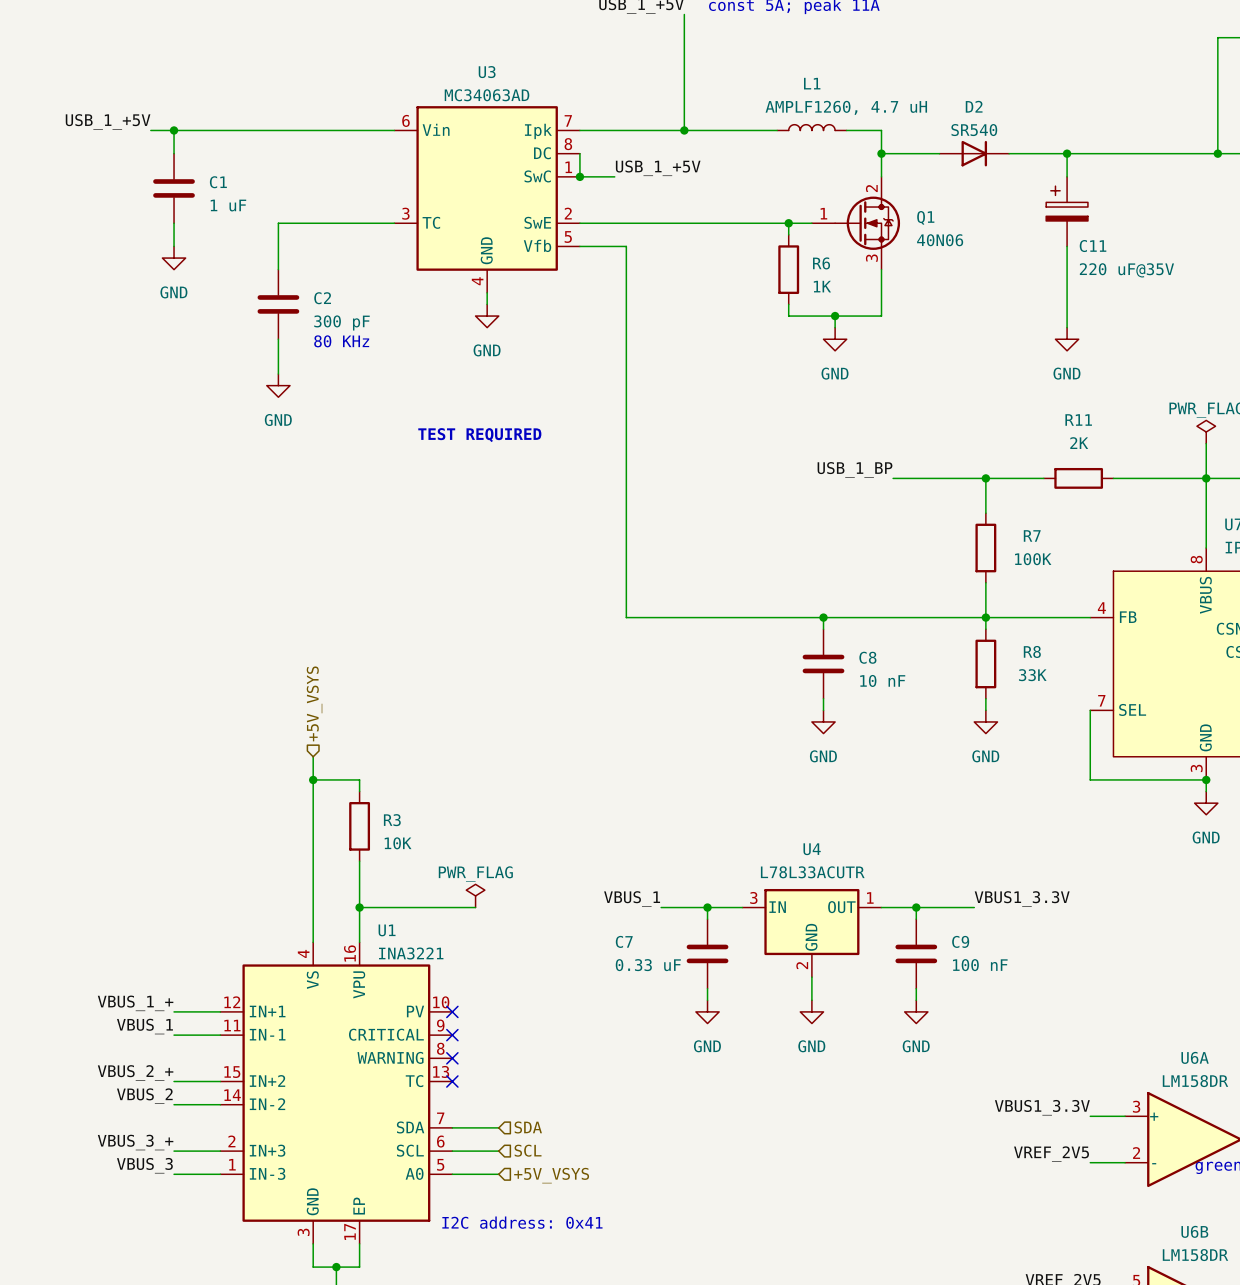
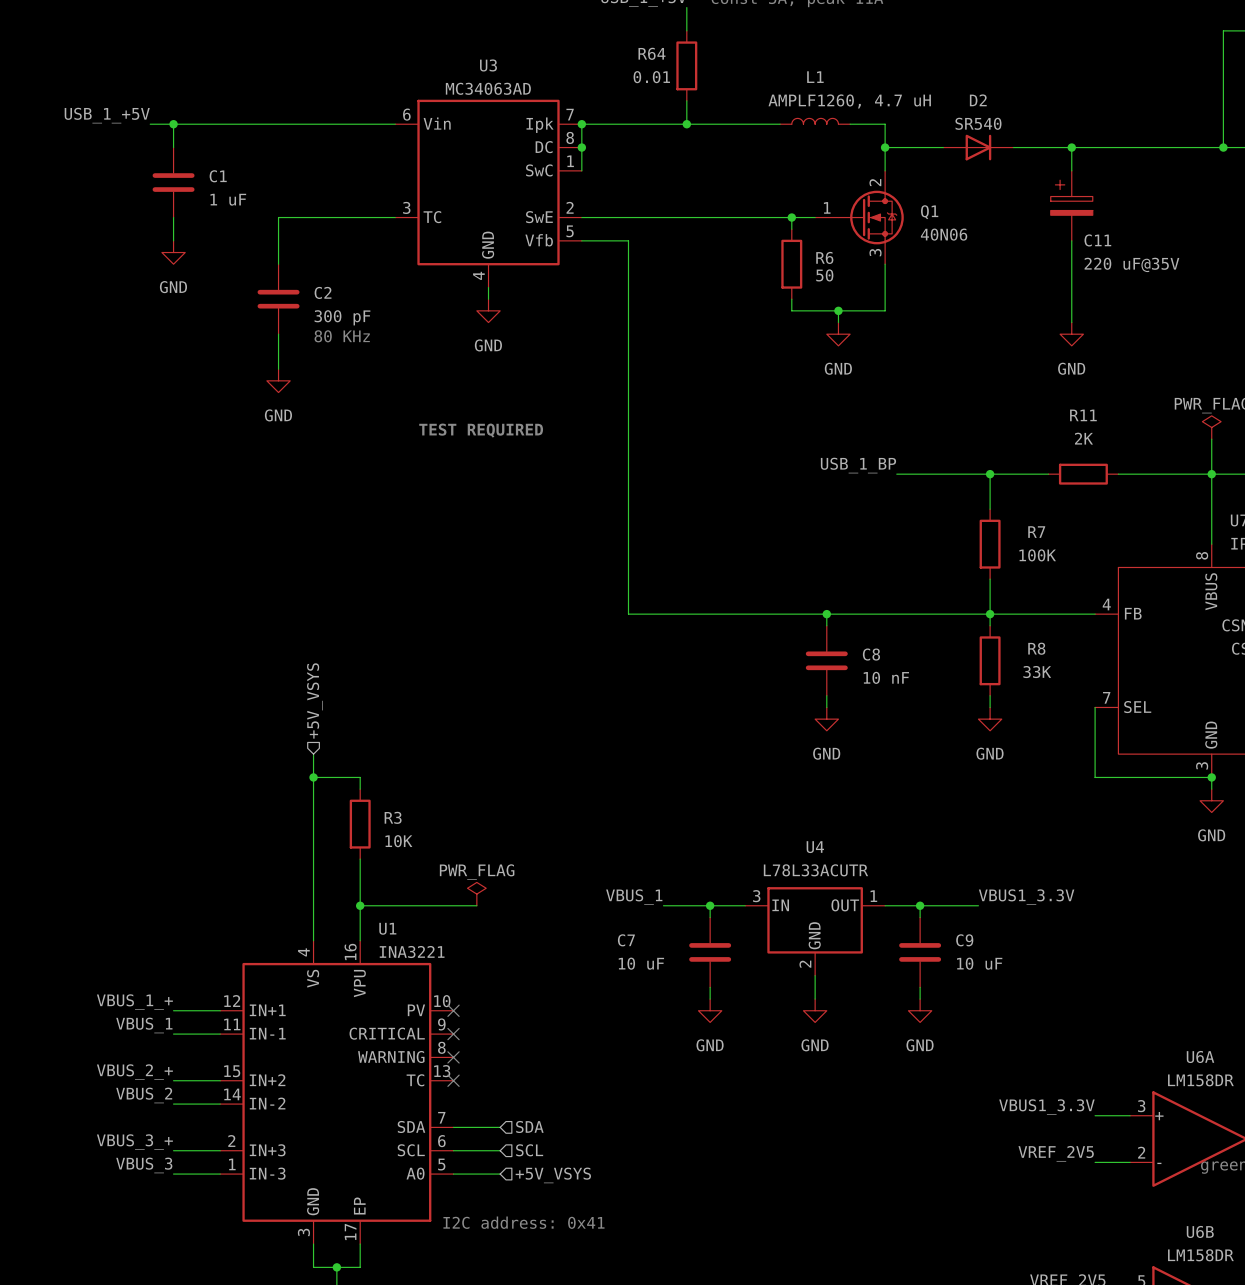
wire: (684, 37) (684, 107) -> none
R64: none -> 0.01 (686, 65)
wire: none -> (581, 124) (581, 147)
junction: none -> (581, 124)
junction: none -> (581, 147)
label: USB_1_+5V (658, 168) -> none
wire: (579, 176) (614, 176) -> none
junction: (579, 176) -> none
R6 value: 1K (822, 286) -> 50 (824, 275)
C7 value: 0.33 uF (648, 965) -> 10 uF (641, 963)
C9 value: 100 nF (980, 965) -> 10 uF (979, 963)

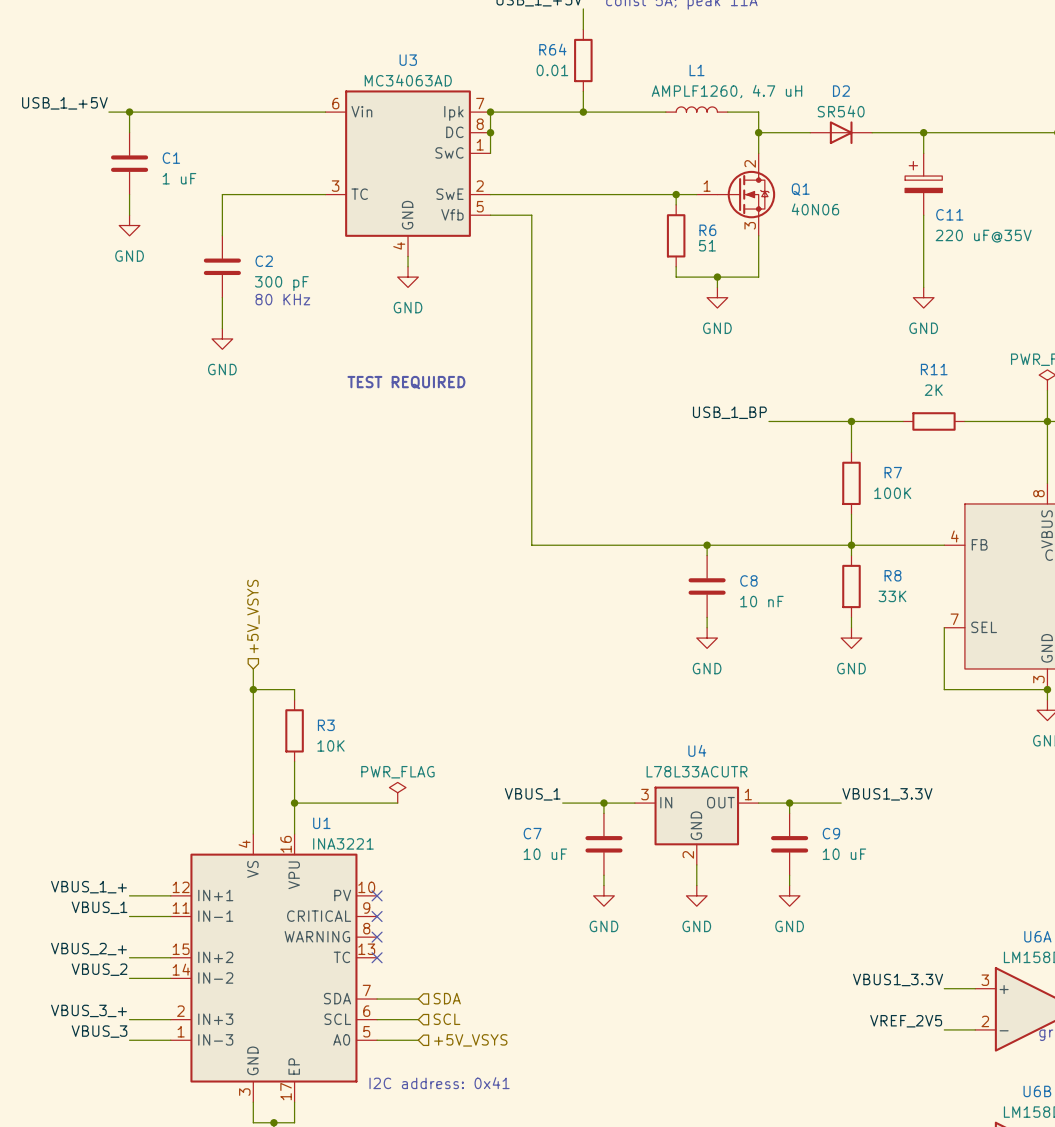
R6 value: 50 (824, 275) -> 51 (707, 245)

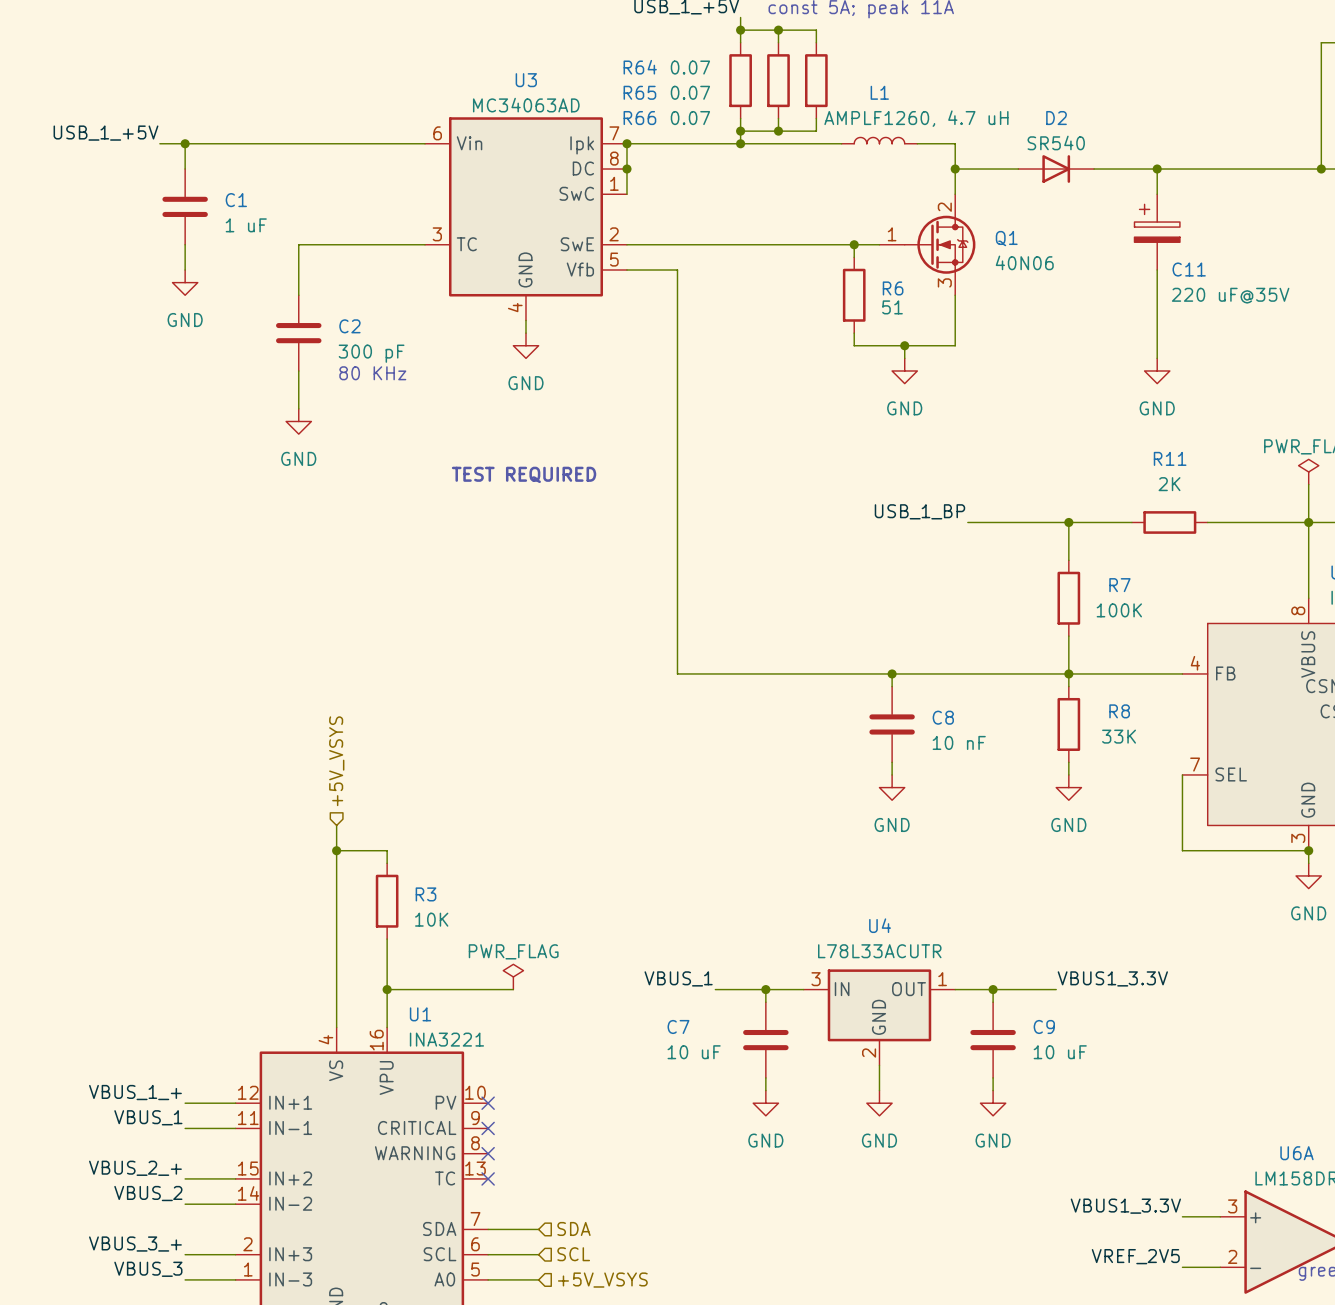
wire: none -> (740, 30) (816, 30) (816, 42)
junction: none -> (740, 30)
wire: none -> (778, 30) (778, 42)
junction: none -> (778, 30)
R64 name position: R64 (552, 49) -> R64 (640, 67)
R65: none -> 0.07 (778, 80)
R66: none -> 0.07 (816, 80)
R64 value: 0.01 (552, 70) -> 0.07 (690, 67)
wire: none -> (778, 118) (778, 131)
wire: none -> (816, 118) (816, 131) (740, 131)
junction: none -> (740, 131)
junction: none -> (778, 131)

